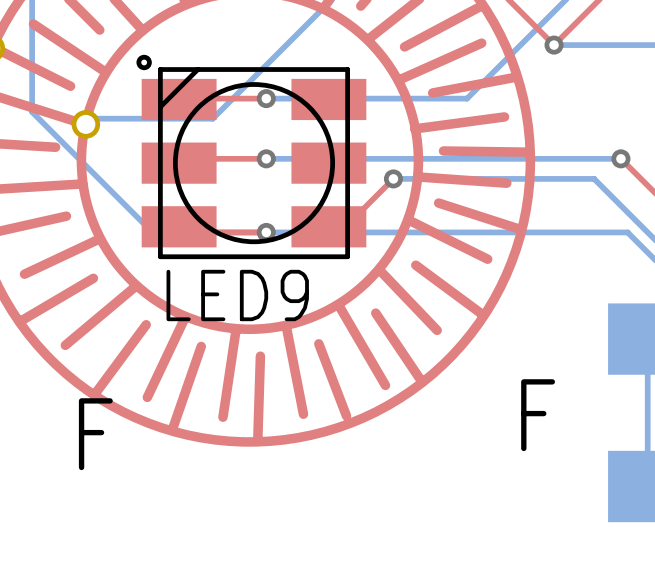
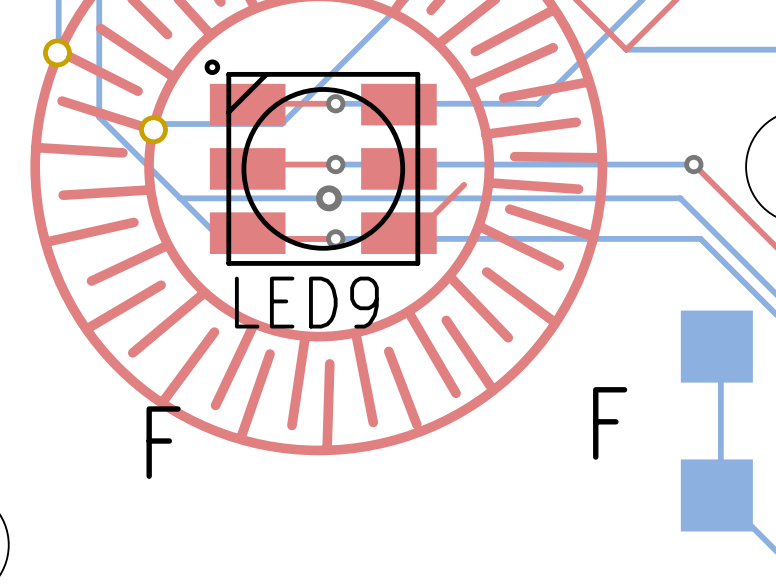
via: (554, 45) -> none
bottom track: (393, 178) (594, 178) (607, 192) -> (180, 198) (680, 198)
via: (393, 178) -> none
via: none -> (328, 198)

